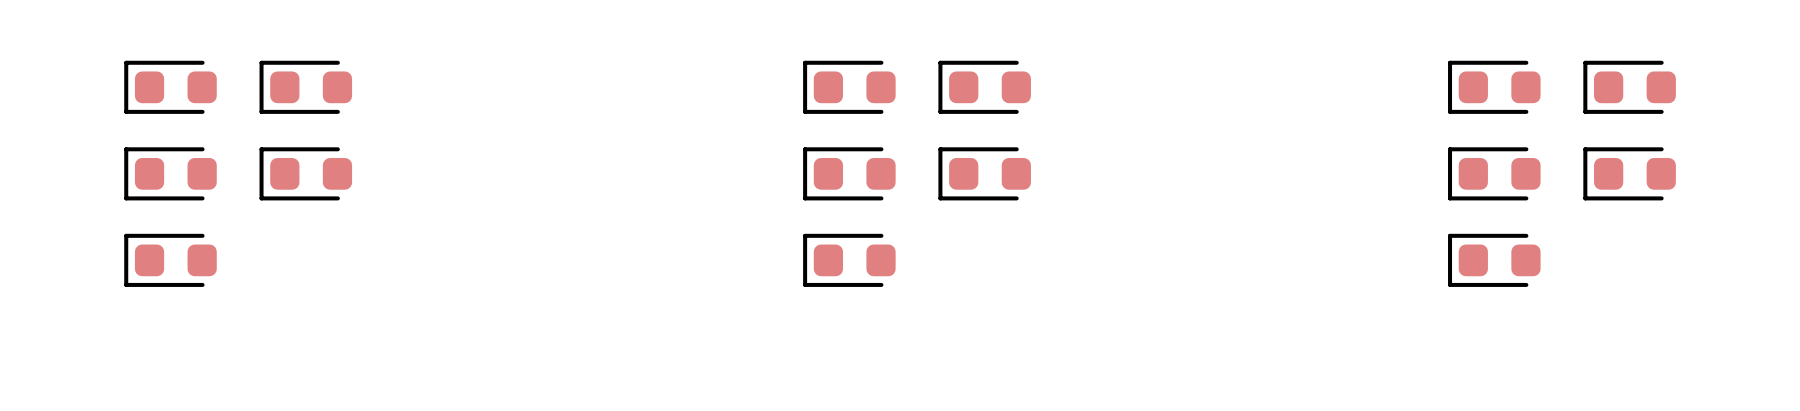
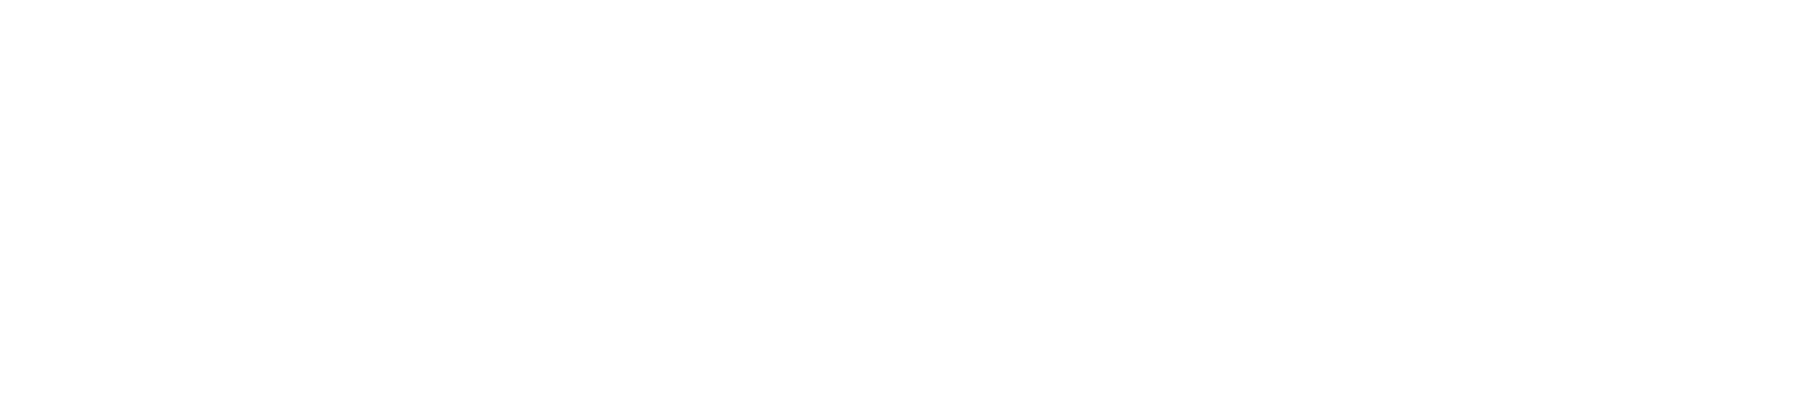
part: (170, 87) -> none
part: (305, 87) -> none
part: (849, 87) -> none
part: (984, 87) -> none
part: (1494, 87) -> none
part: (1629, 87) -> none
part: (170, 173) -> none
part: (305, 173) -> none
part: (849, 173) -> none
part: (984, 173) -> none
part: (1494, 173) -> none
part: (1629, 173) -> none
part: (170, 260) -> none
part: (849, 260) -> none
part: (1494, 260) -> none

